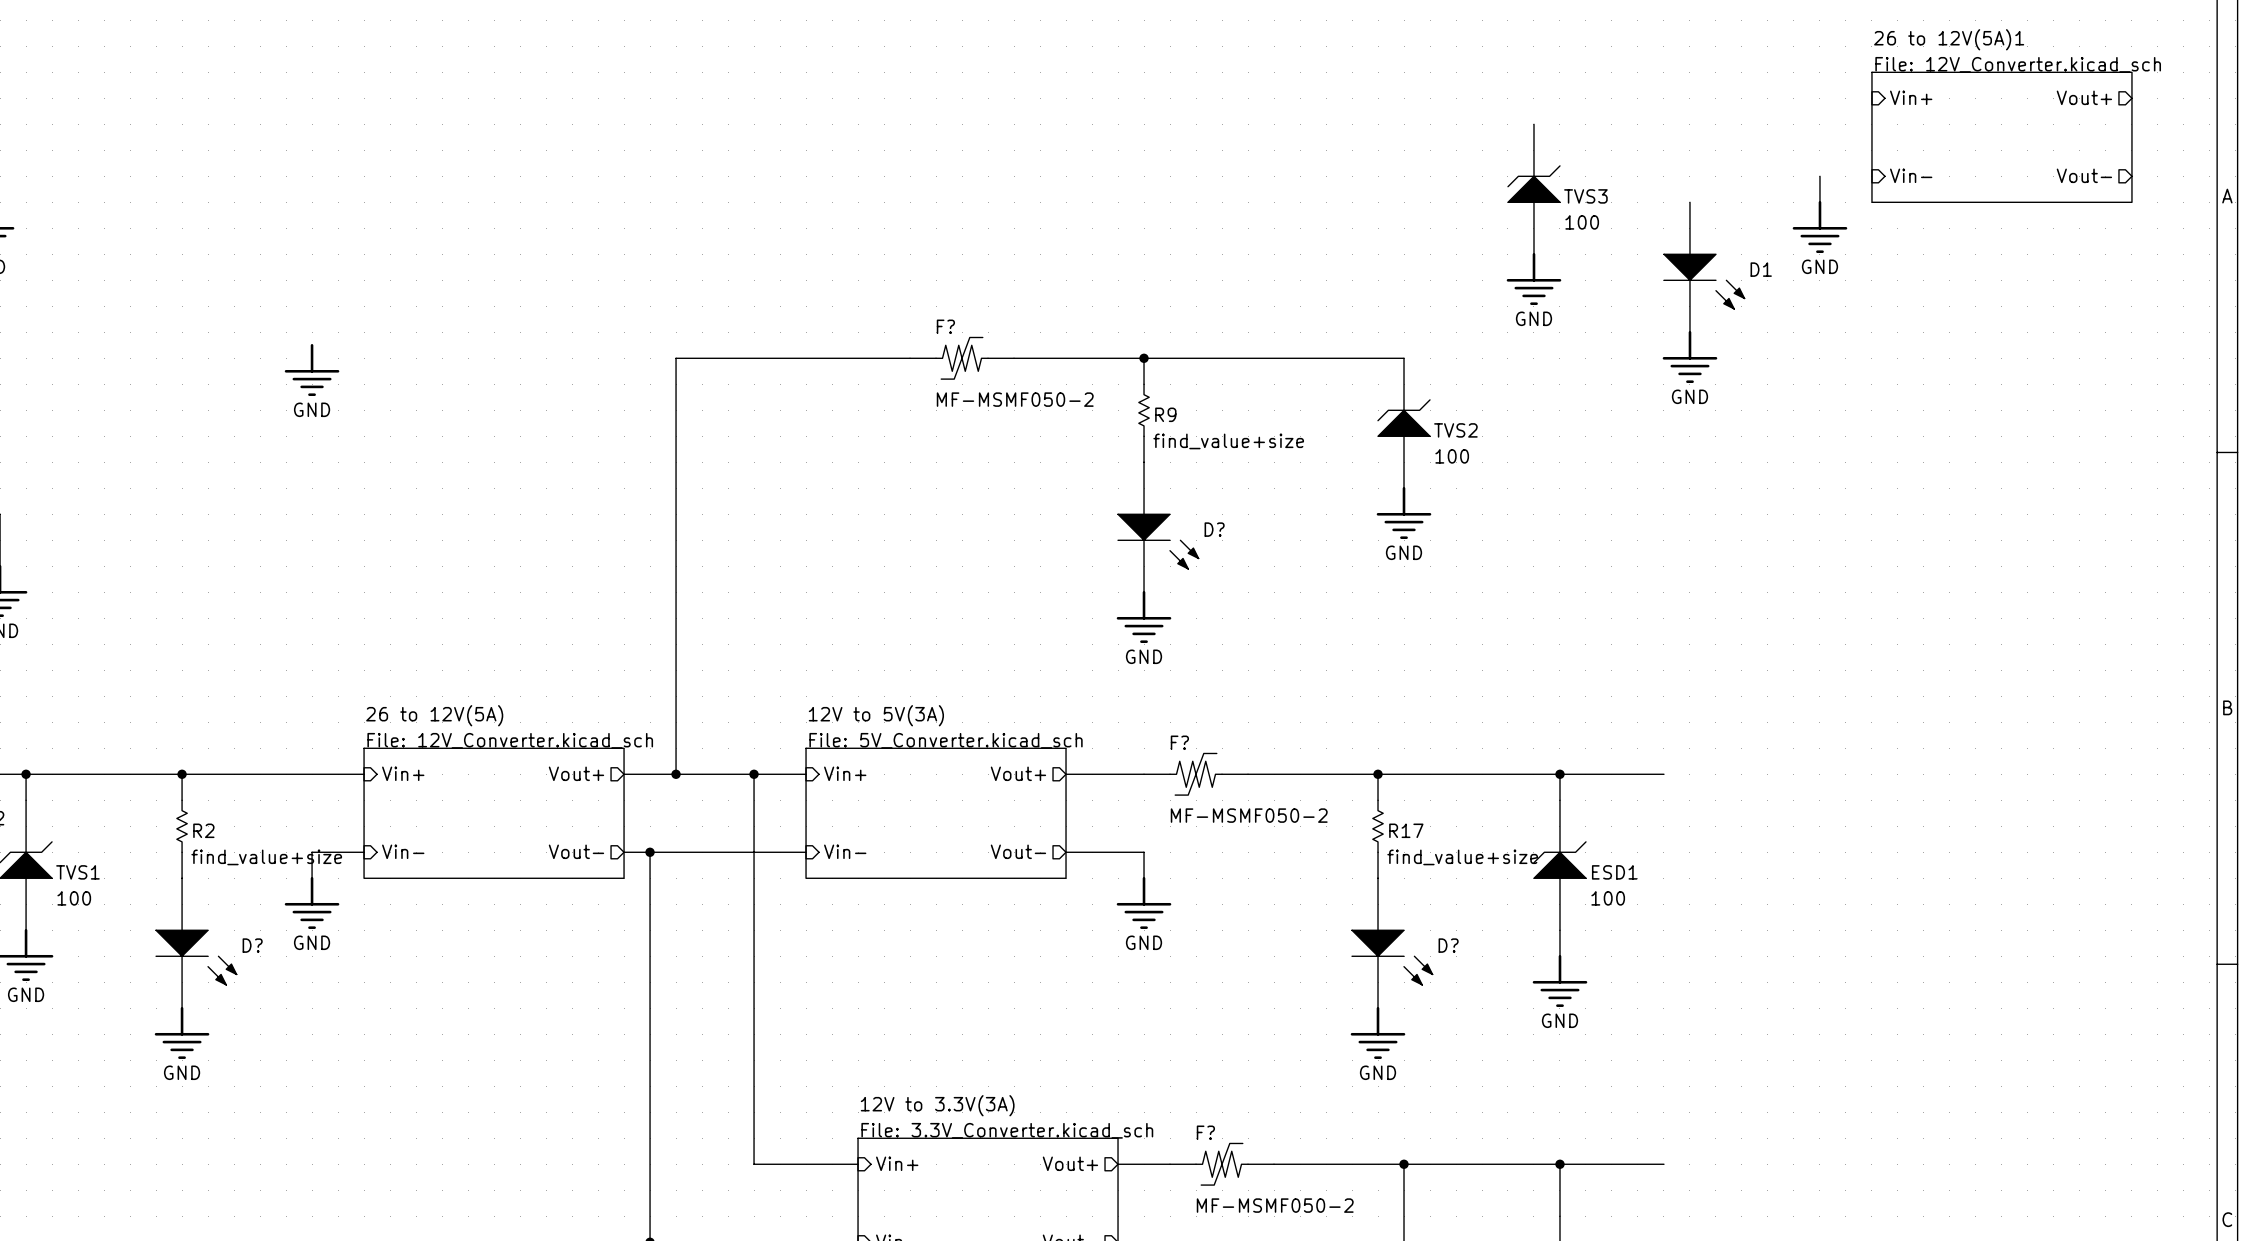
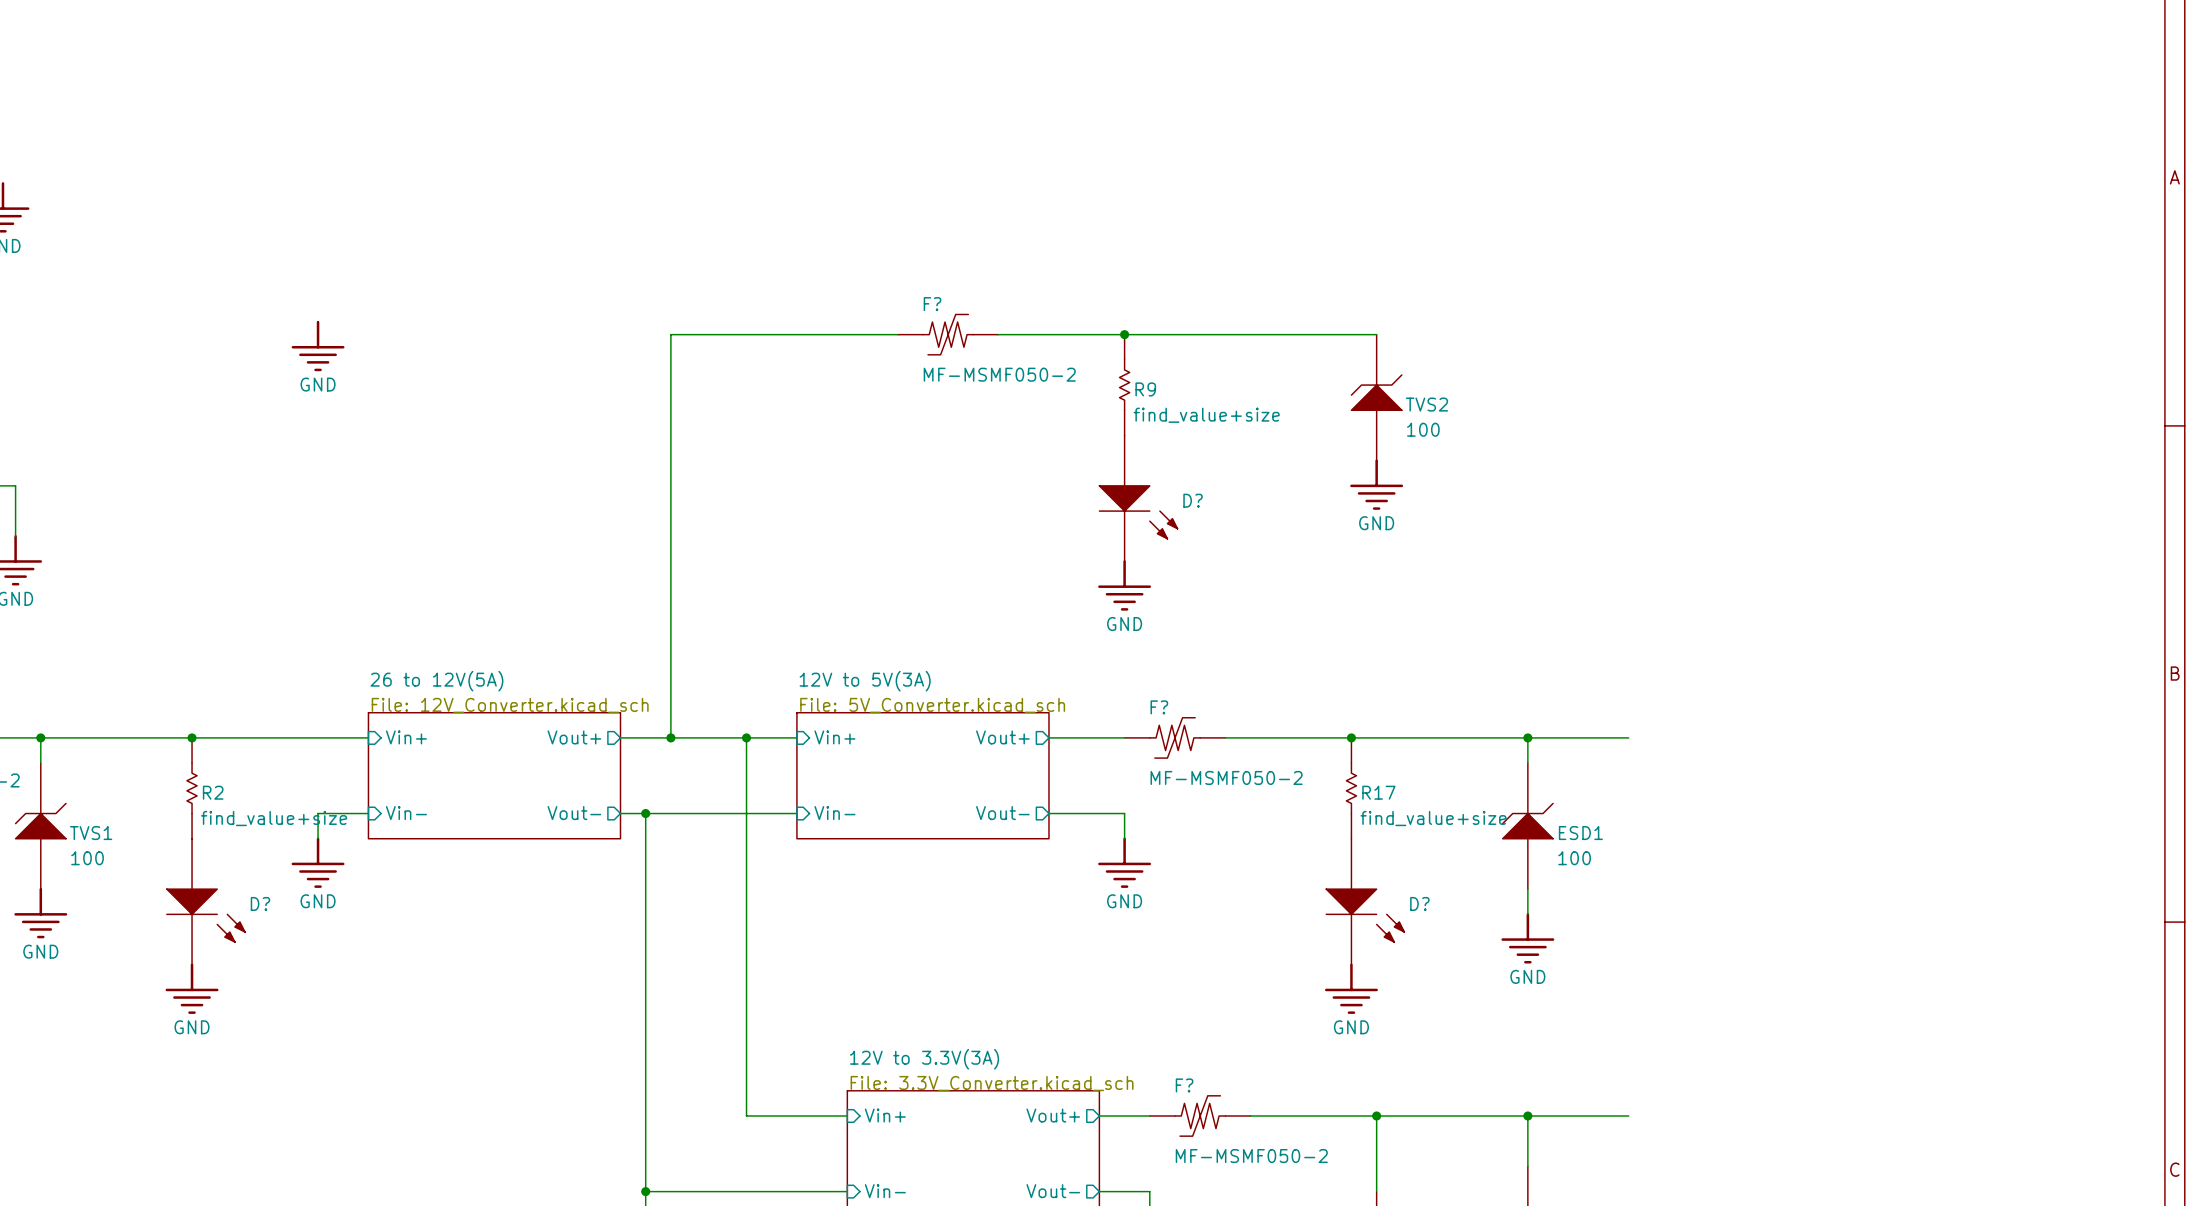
sheet pin: Vin+ (1911, 97) -> none
sheet pin: Vout+ (2084, 97) -> none
sheet 26 to 12V(5A)1: File: 12V_Converter.kicad_sch (2001, 137) -> none
sheet pin: Vin- (1911, 175) -> none
sheet pin: Vout- (2084, 175) -> none
wire: (1819, 176) (1819, 202) -> none
TVS3: (1533, 189) -> none
power symbol: GND (1819, 227) -> none
D1: (1704, 267) -> none
power symbol: GND (1533, 279) -> none
power symbol: GND (1689, 357) -> none

